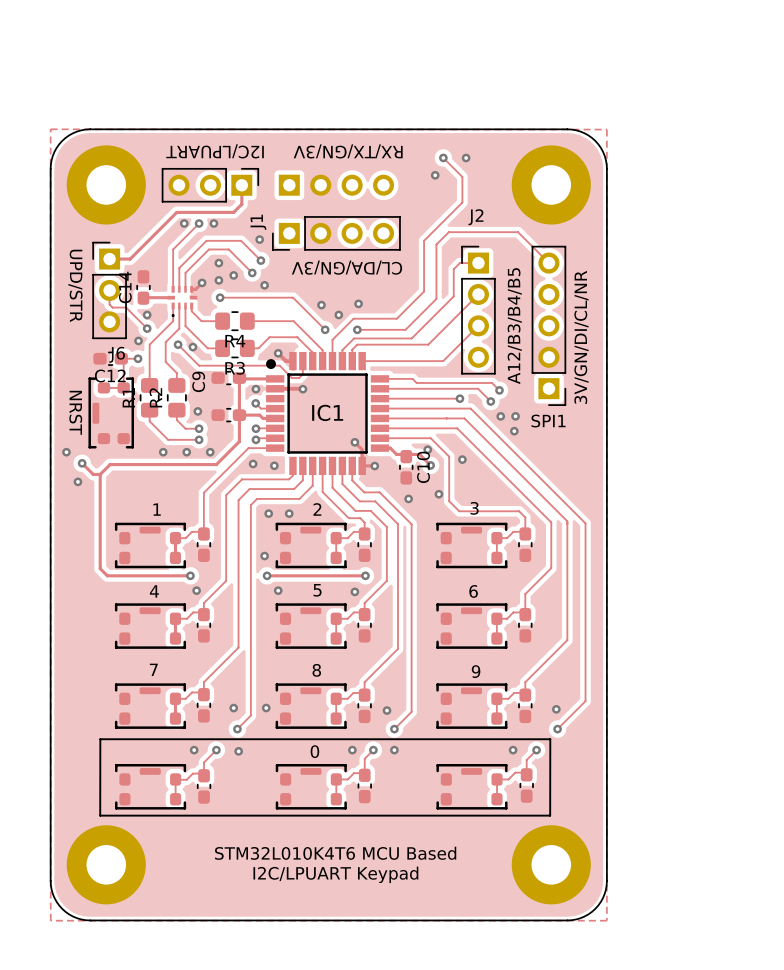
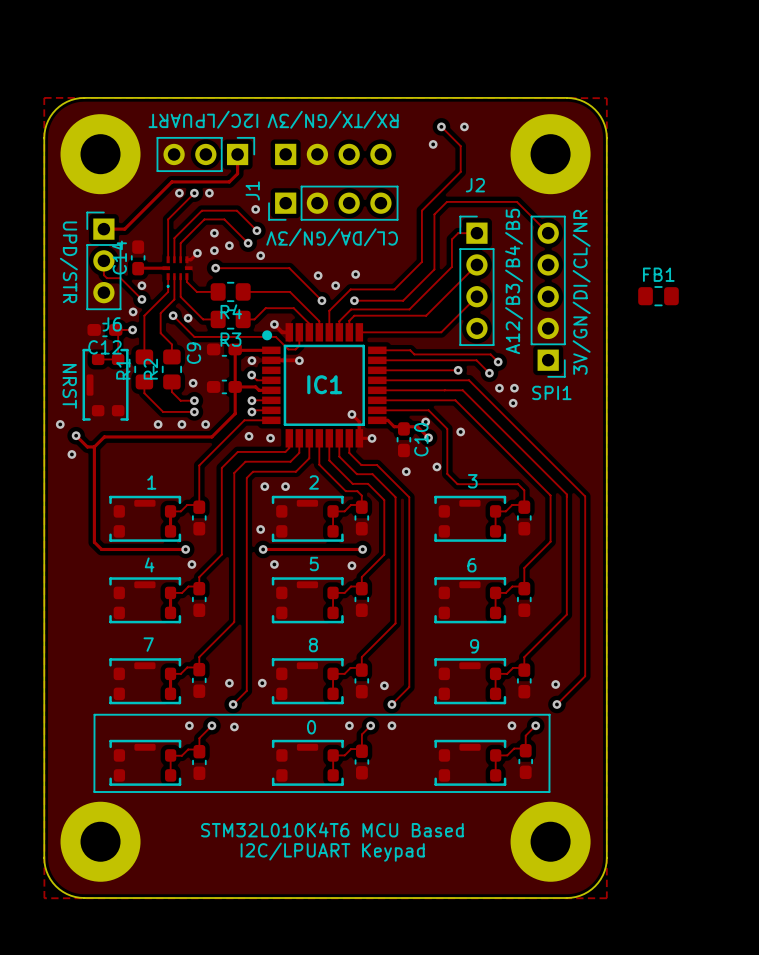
FB1: none -> (658, 296)

